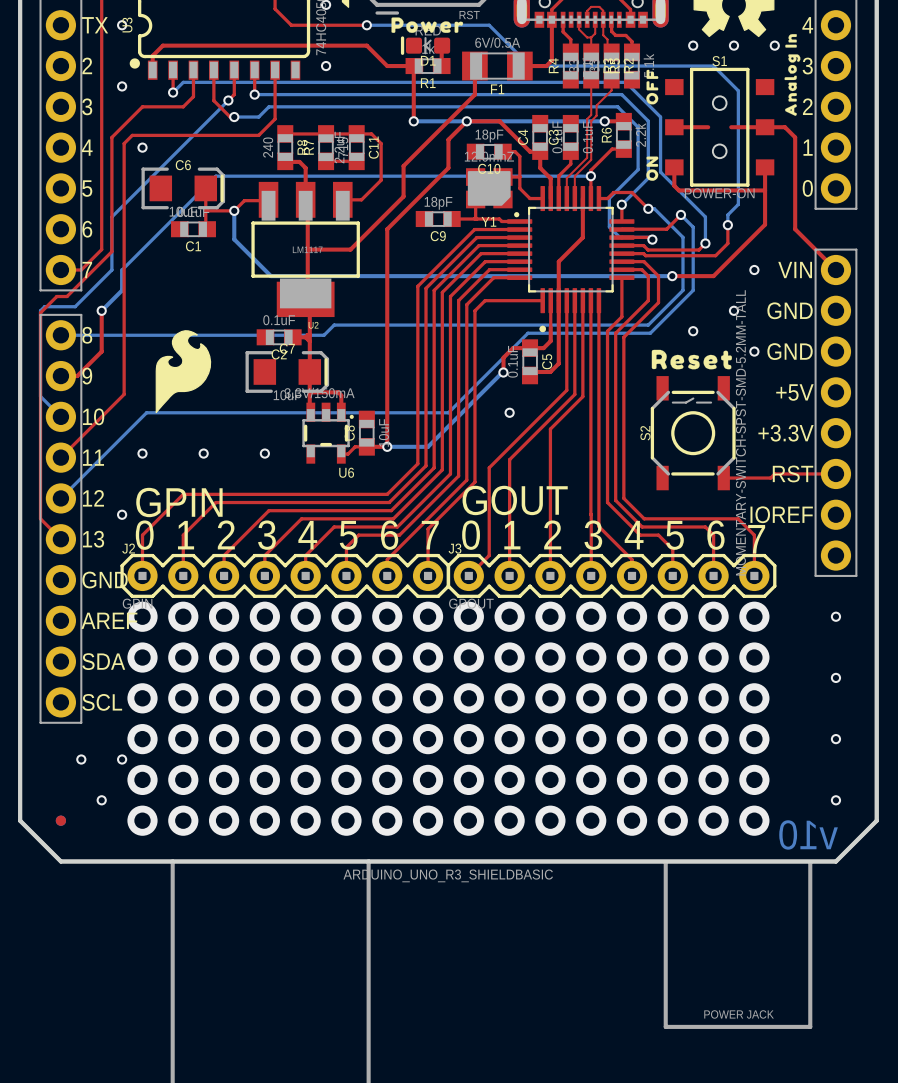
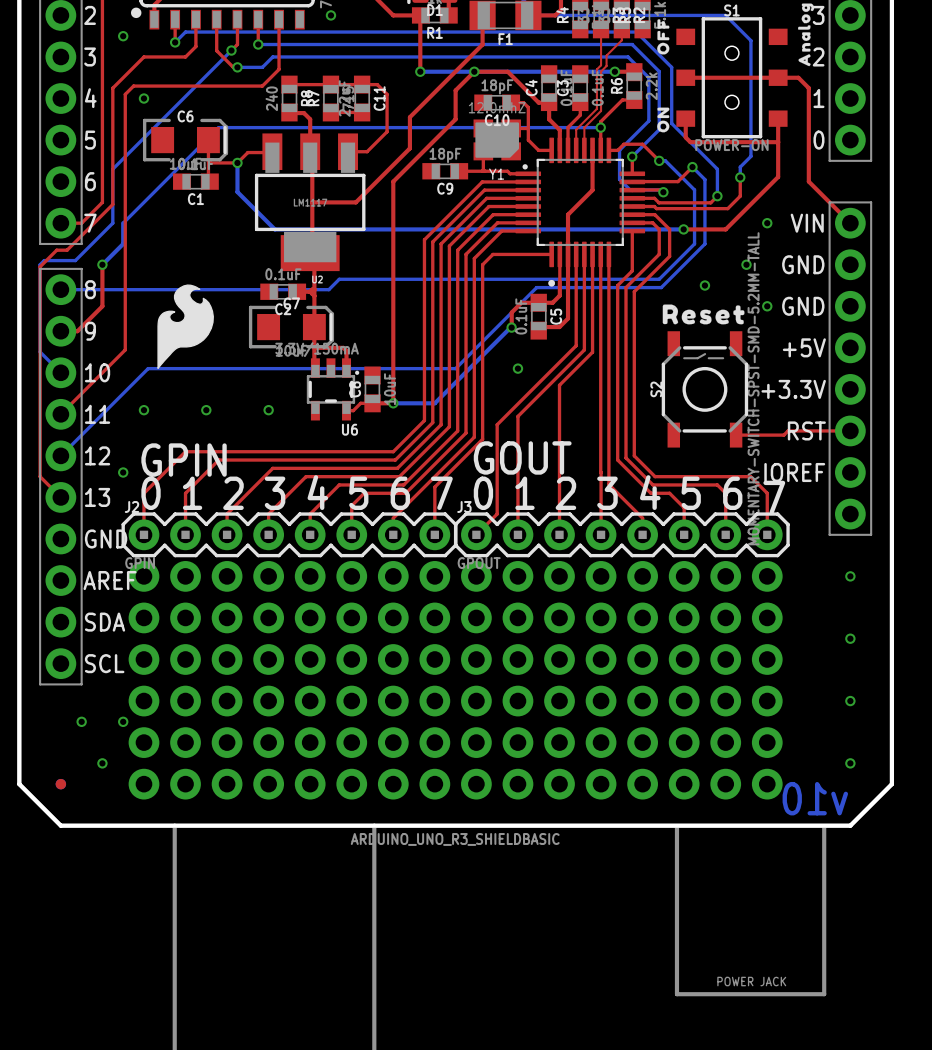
top track: none -> (720, 77) (743, 77)

